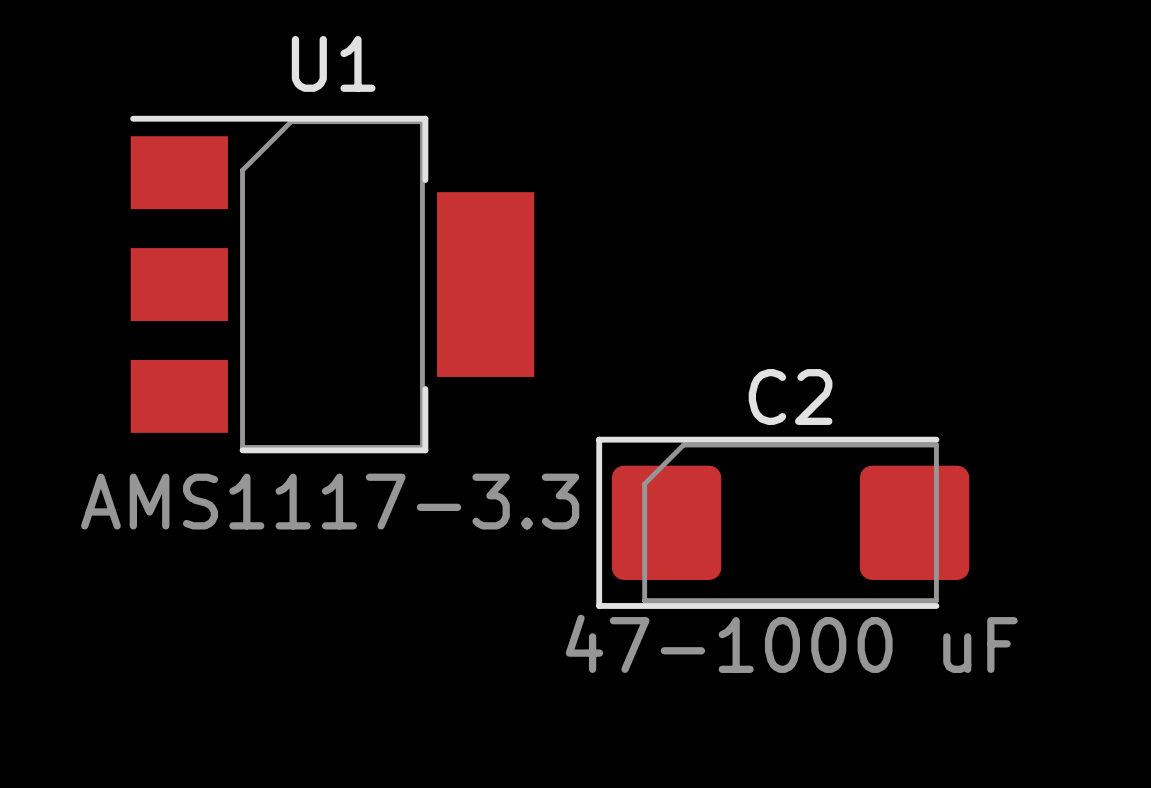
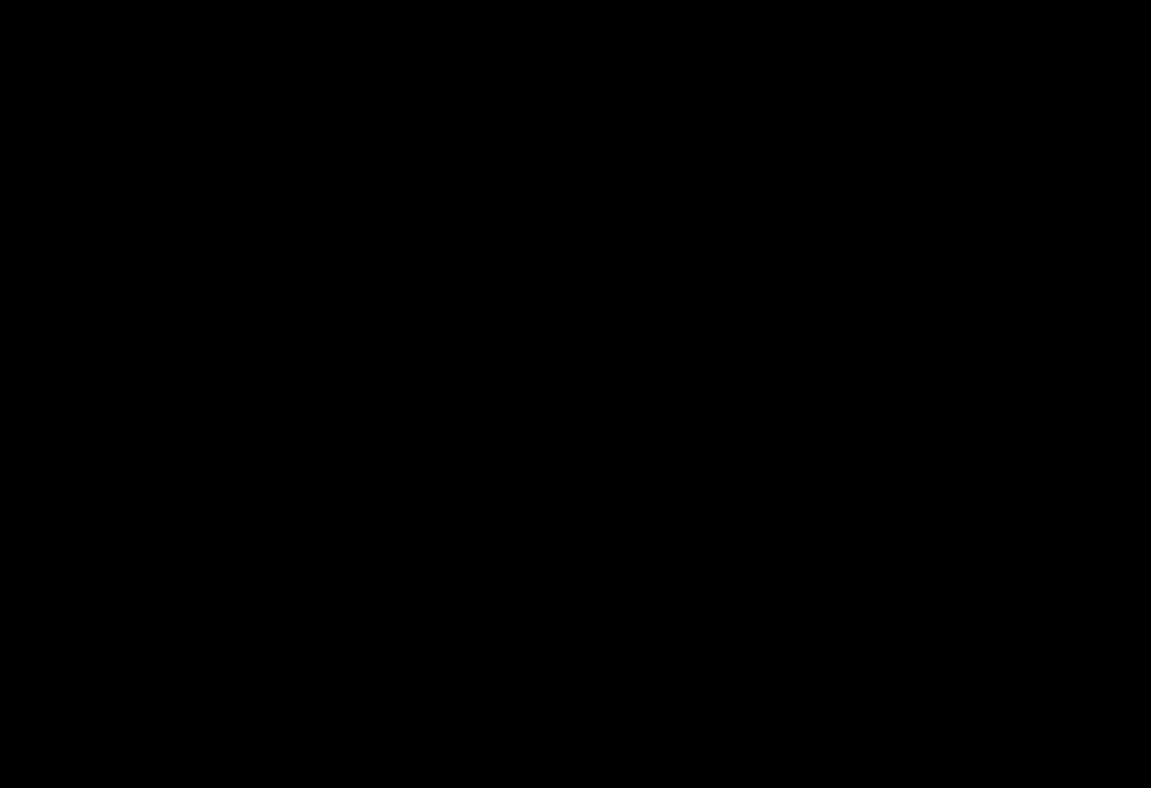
U1: AMS1117-3.3 (332, 284) -> none
C2: 47-1000 uF (782, 522) -> none

